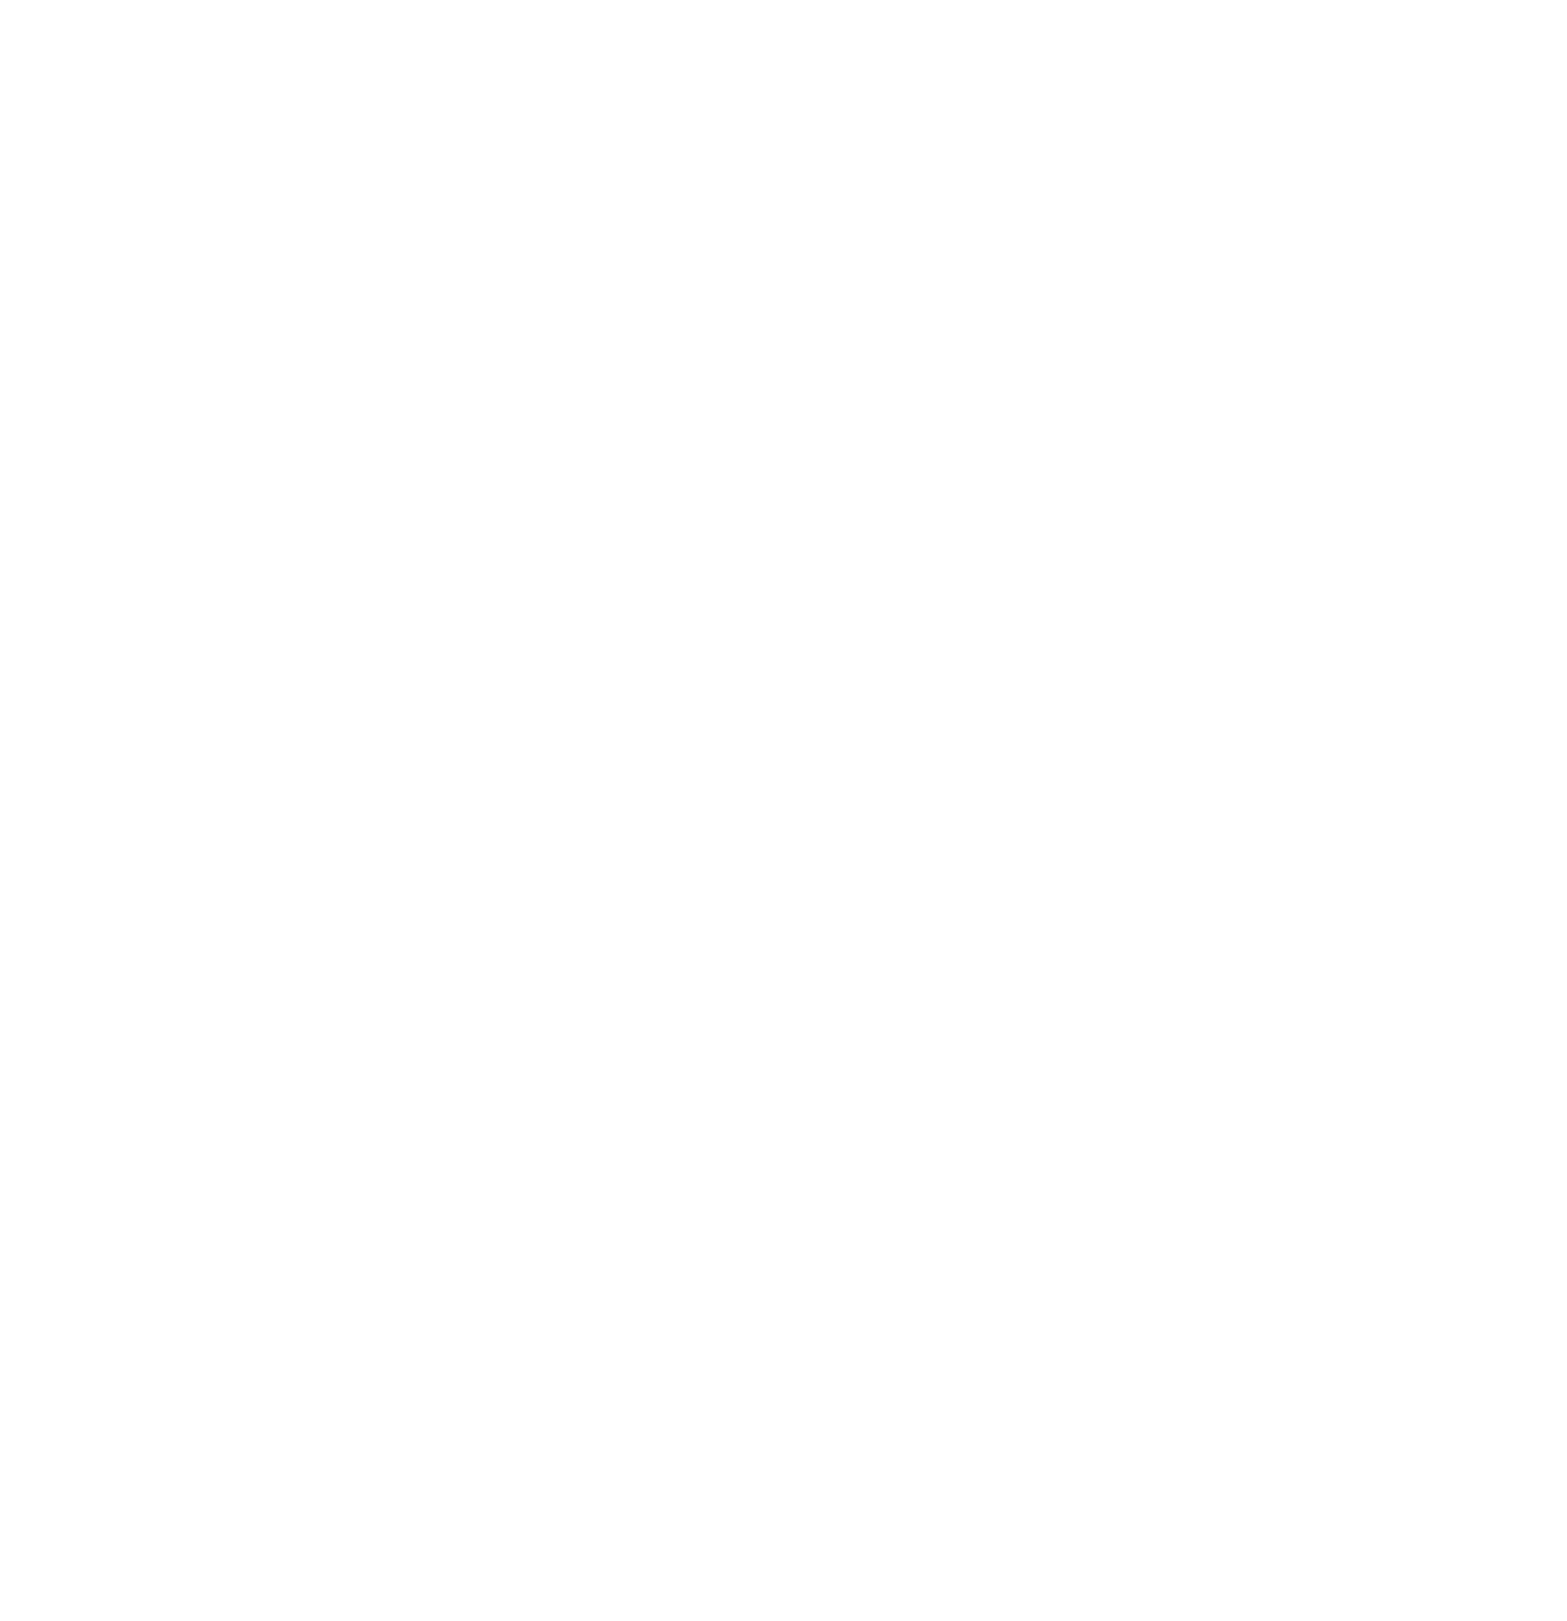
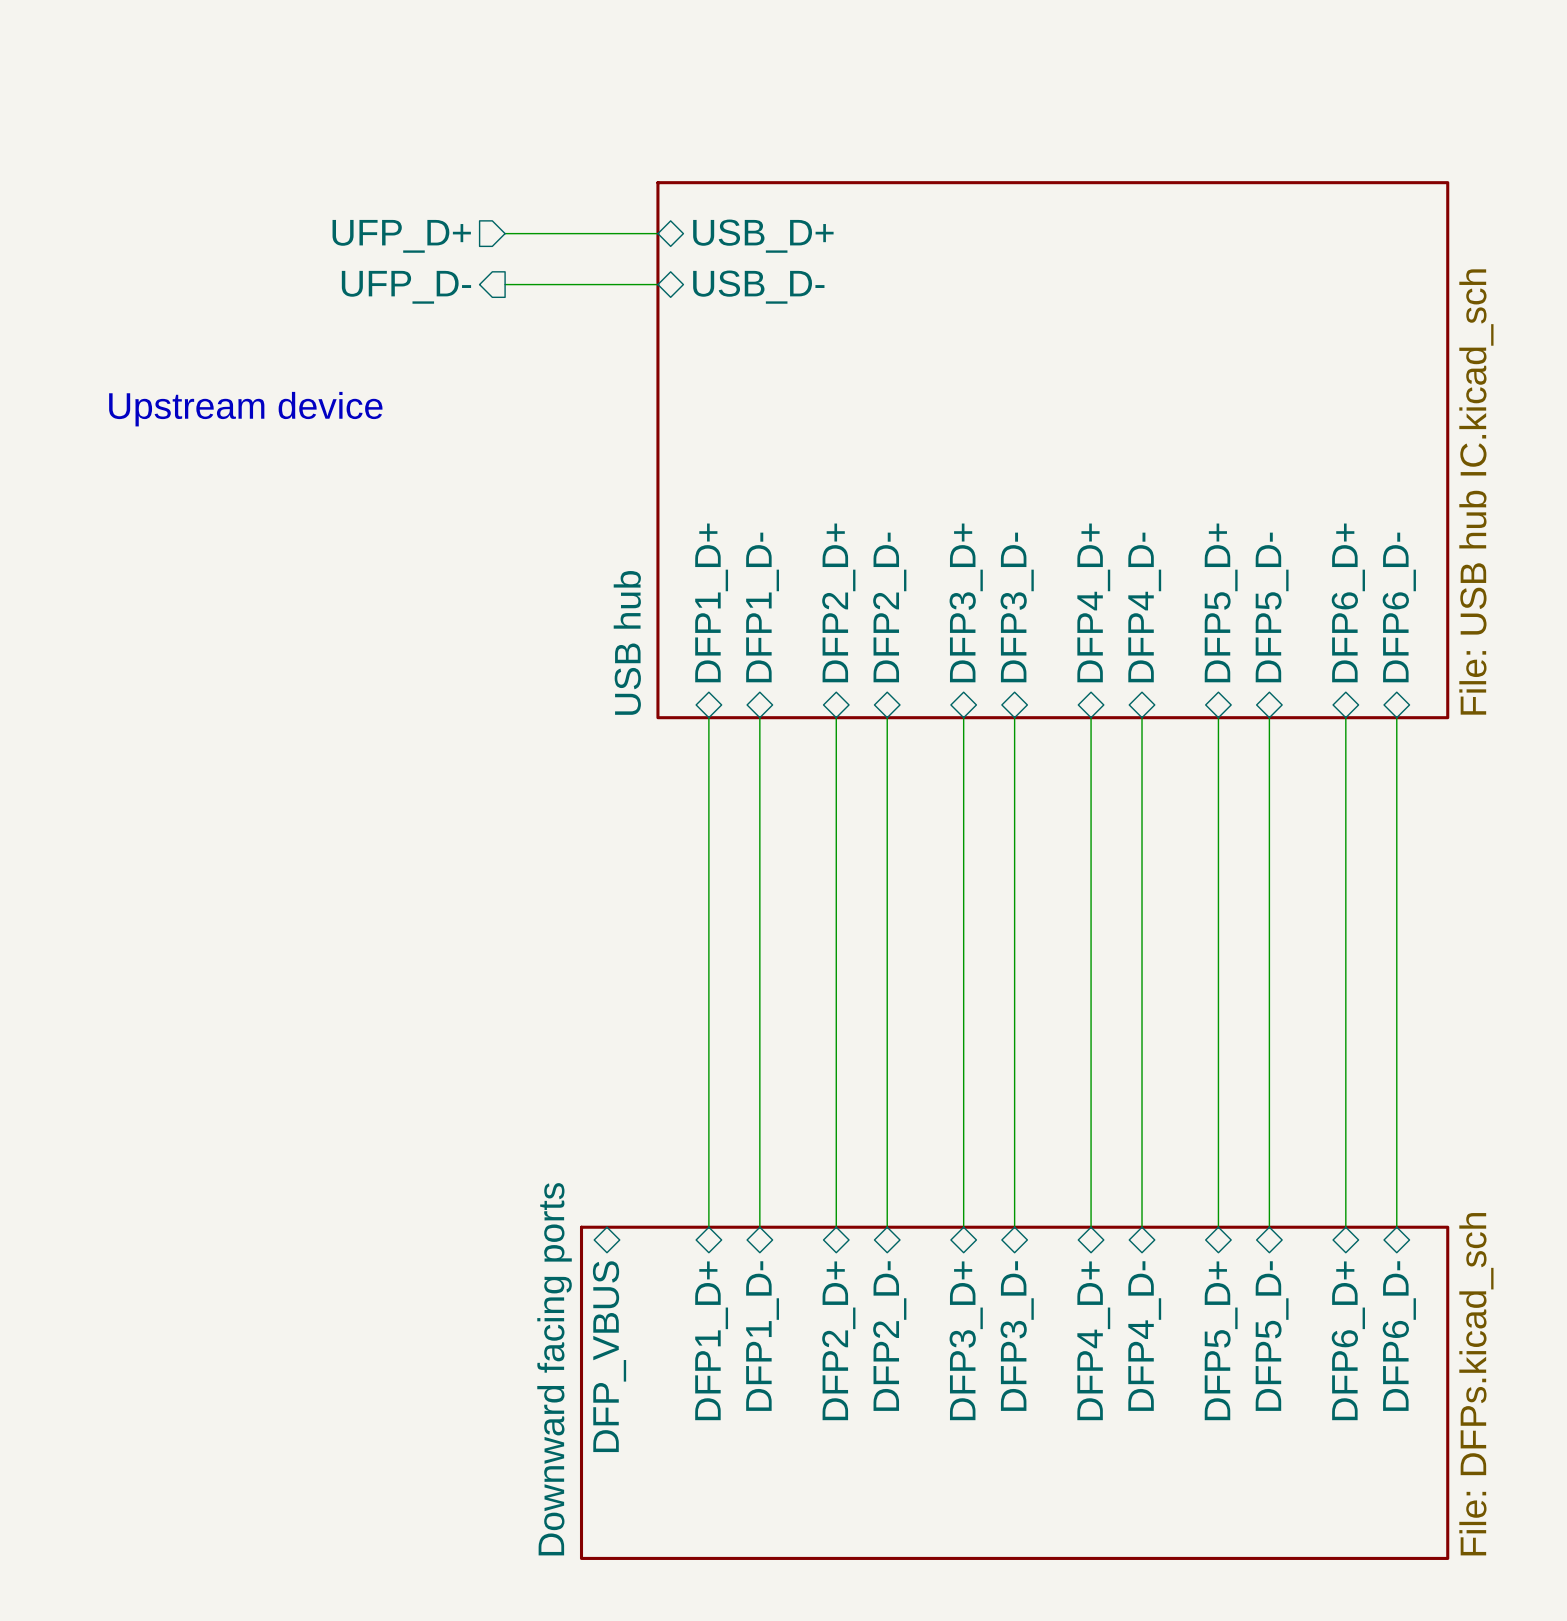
wire: none -> (505, 233) (657, 233)
sheet pin: none -> UFP_D+ (401, 236)
sheet pin: none -> USB_D+ (763, 236)
wire: none -> (505, 284) (657, 284)
sheet pin: none -> UFP_D- (406, 287)
sheet pin: none -> USB_D- (758, 287)
text: none -> Upstream device (245, 409)
sheet USB hub: none -> File: USB hub IC.kicad_sch (1052, 450)
sheet pin: none -> DFP1_D+ (711, 602)
sheet pin: none -> DFP2_D+ (838, 602)
sheet pin: none -> DFP3_D+ (966, 602)
sheet pin: none -> DFP4_D+ (1093, 602)
sheet pin: none -> DFP5_D+ (1221, 602)
sheet pin: none -> DFP6_D+ (1348, 602)
sheet pin: none -> DFP1_D- (762, 607)
sheet pin: none -> DFP2_D- (889, 607)
sheet pin: none -> DFP3_D- (1017, 607)
sheet pin: none -> DFP4_D- (1144, 607)
sheet pin: none -> DFP5_D- (1272, 607)
sheet pin: none -> DFP6_D- (1399, 607)
wire: none -> (708, 717) (708, 1227)
wire: none -> (759, 717) (759, 1227)
wire: none -> (836, 717) (836, 1227)
wire: none -> (887, 717) (887, 1227)
wire: none -> (963, 717) (963, 1227)
wire: none -> (1014, 717) (1014, 1227)
wire: none -> (1091, 717) (1091, 1227)
wire: none -> (1142, 717) (1142, 1227)
wire: none -> (1218, 717) (1218, 1227)
wire: none -> (1269, 717) (1269, 1227)
wire: none -> (1345, 717) (1345, 1227)
wire: none -> (1396, 717) (1396, 1227)
sheet pin: none -> DFP1_D+ (711, 1340)
sheet pin: none -> DFP2_D+ (838, 1340)
sheet pin: none -> DFP3_D+ (966, 1340)
sheet pin: none -> DFP4_D+ (1093, 1340)
sheet pin: none -> DFP5_D+ (1221, 1340)
sheet pin: none -> DFP6_D+ (1348, 1340)
sheet pin: none -> DFP1_D- (762, 1336)
sheet pin: none -> DFP2_D- (889, 1336)
sheet pin: none -> DFP3_D- (1017, 1336)
sheet pin: none -> DFP4_D- (1144, 1336)
sheet pin: none -> DFP5_D- (1272, 1336)
sheet pin: none -> DFP6_D- (1399, 1336)
sheet pin: none -> DFP_VBUS (609, 1356)
sheet Downward facing ports: none -> File: DFPs.kicad_sch (1014, 1392)

